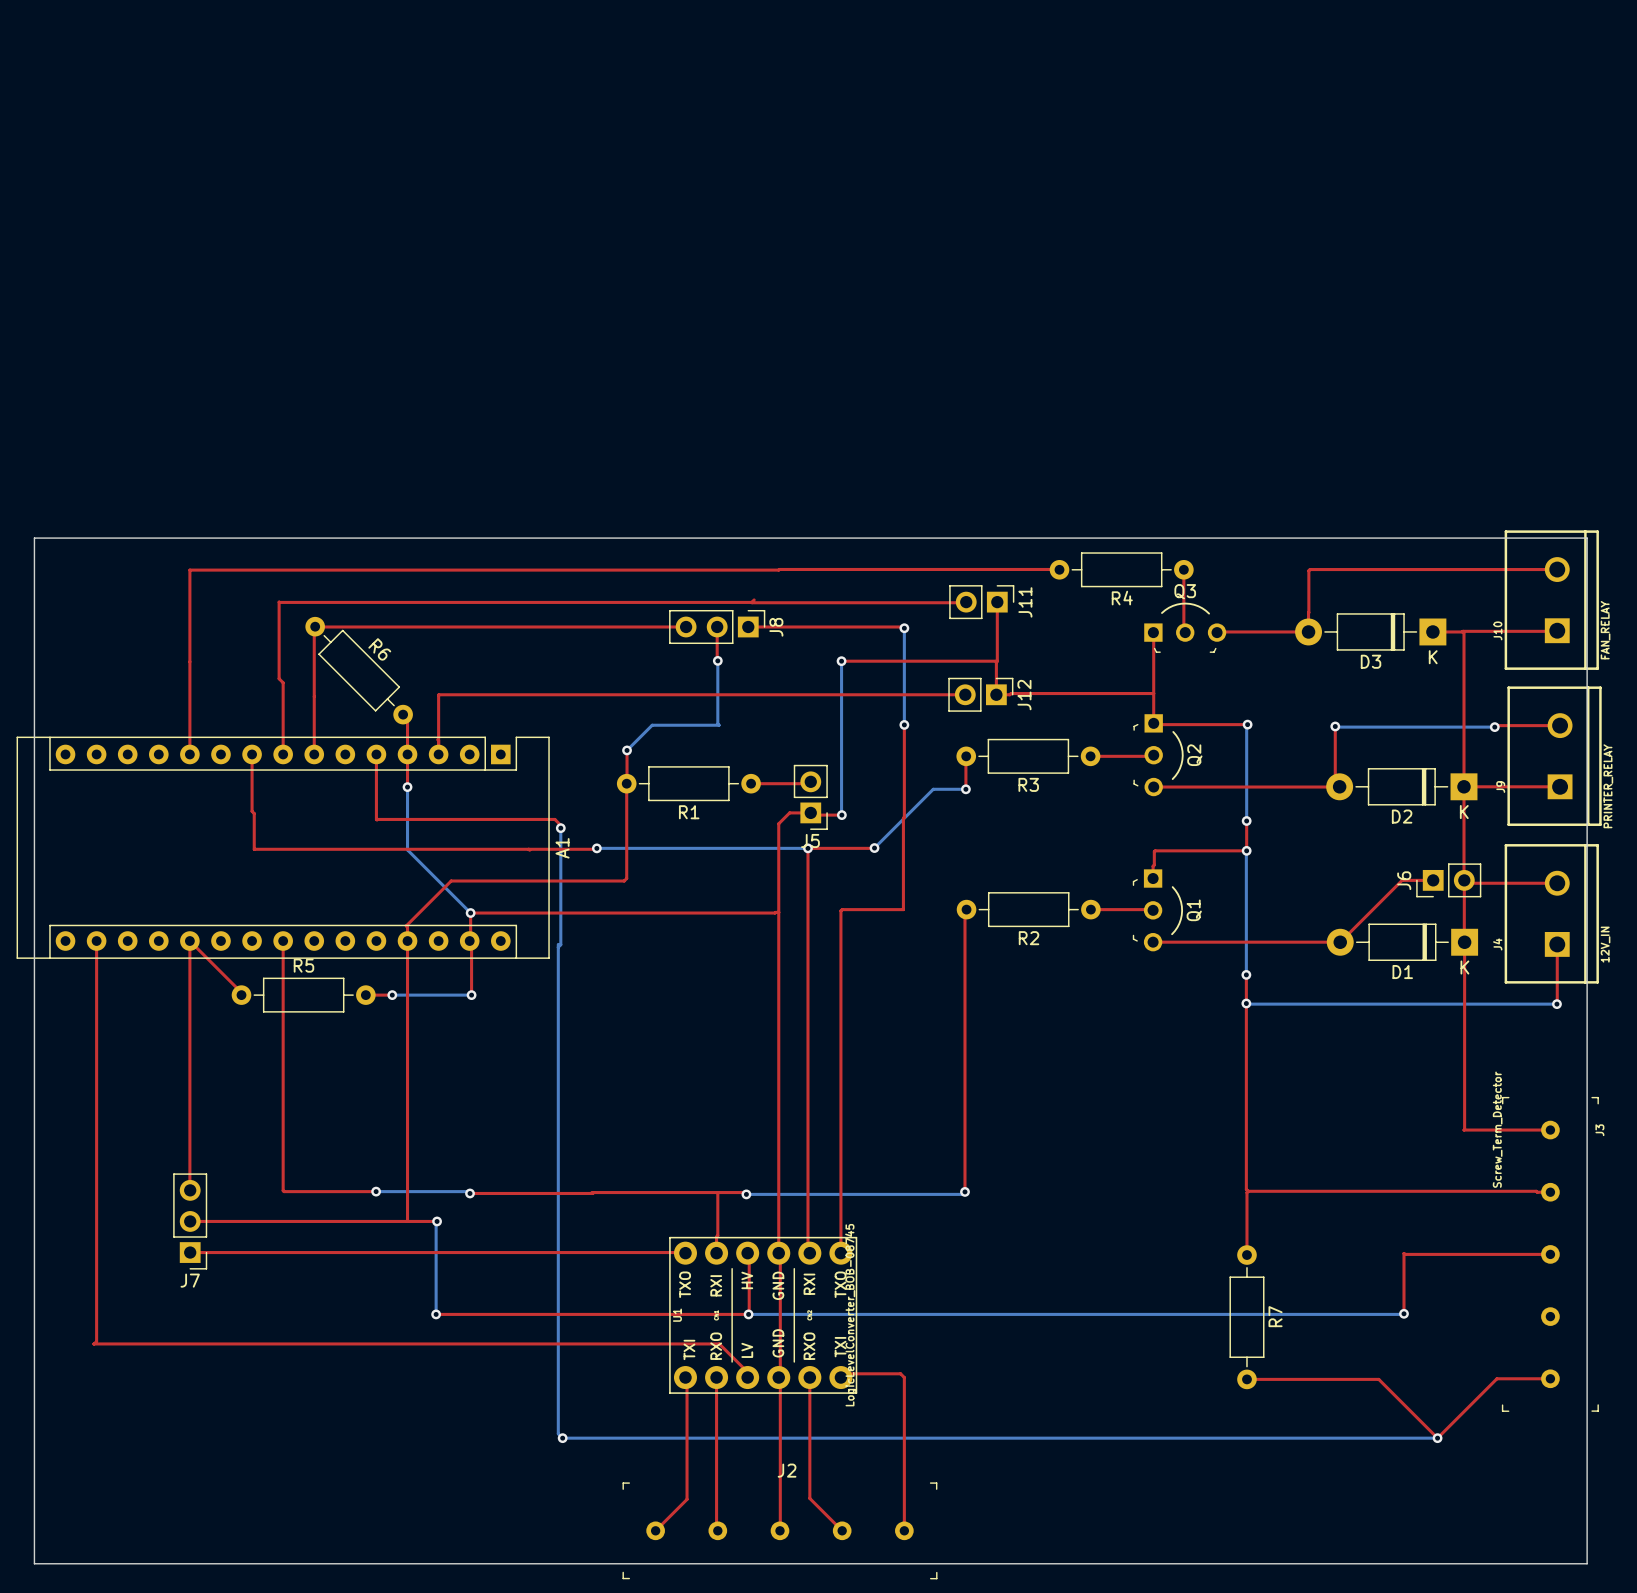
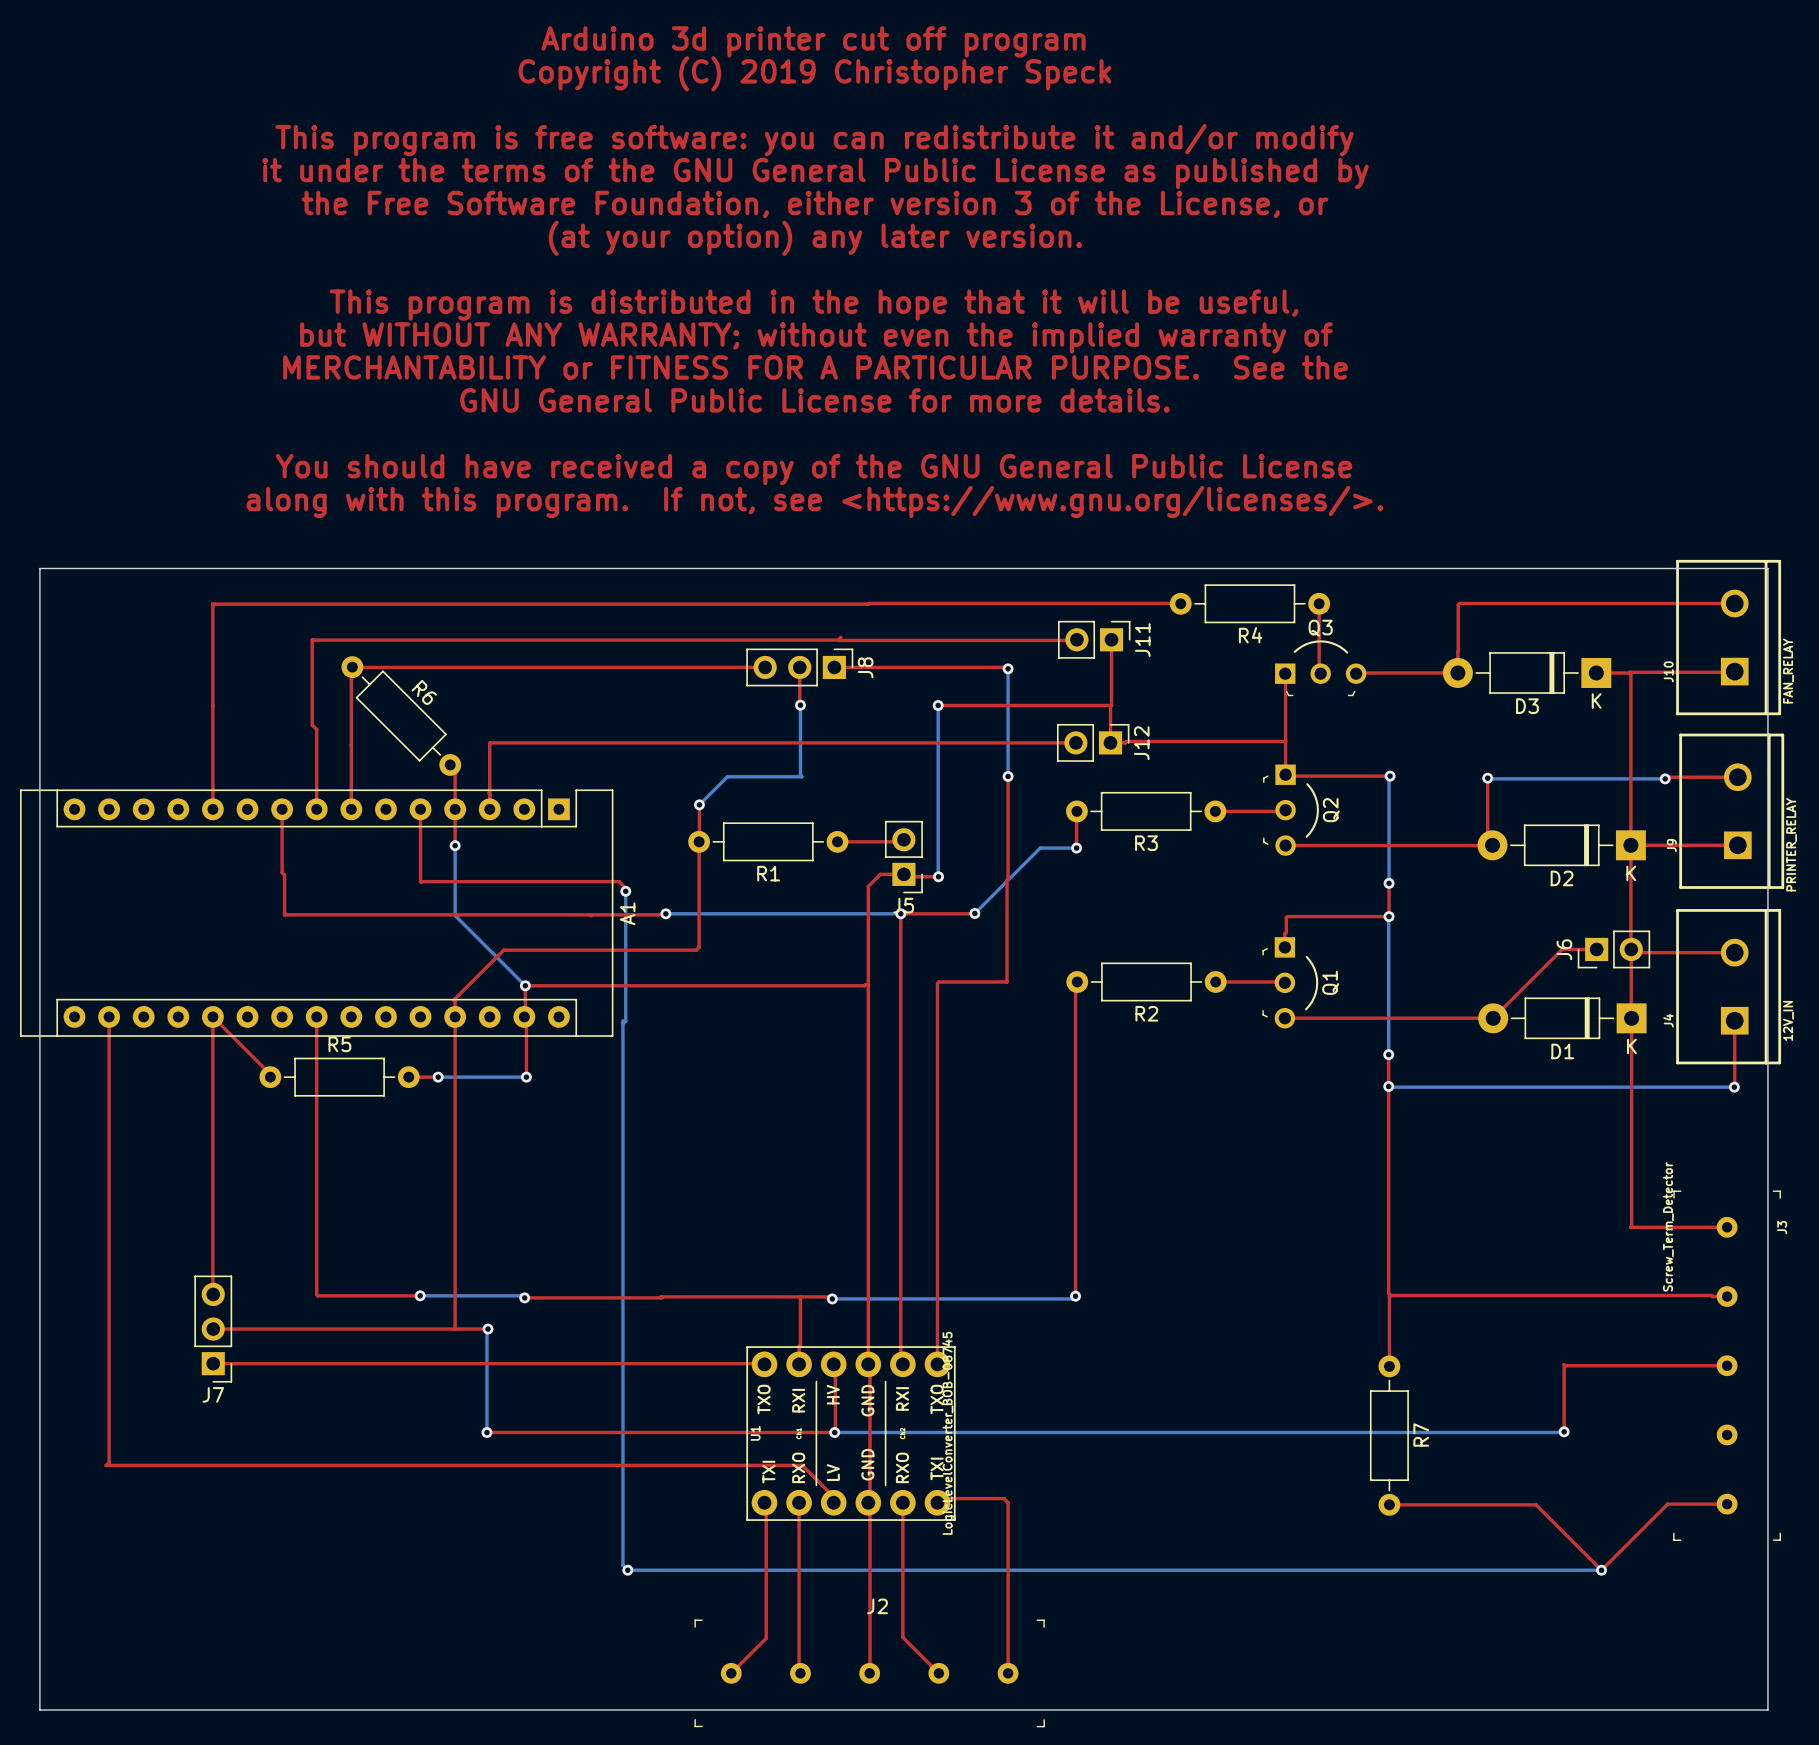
text: none -> Arduino 3d printer cut off program (813, 41)
text: none -> Copyright (C) 2019 Christopher Speck (815, 73)
text: none -> This program is free software: you can redistribute it and/or modify (814, 140)
text: none -> it under the terms of the GNU General Public License as published by (815, 173)
text: none -> the Free Software Foundation, either version 3 of the License, or (815, 204)
text: none -> (at your option) any later version. (815, 238)
text: none -> This program is distributed in the hope that it will be useful, (814, 305)
text: none -> but WITHOUT ANY WARRANTY; without even the implied warranty of (816, 337)
text: none -> MERCHANTABILITY or FITNESS FOR A PARTICULAR PURPOSE. See the (815, 367)
text: none -> GNU General Public License for more details. (815, 400)
text: none -> You should have received a copy of the GNU General Public License (814, 469)
text: none -> along with this program. If not, see <https://www.gnu.org/licenses/>. (815, 501)

